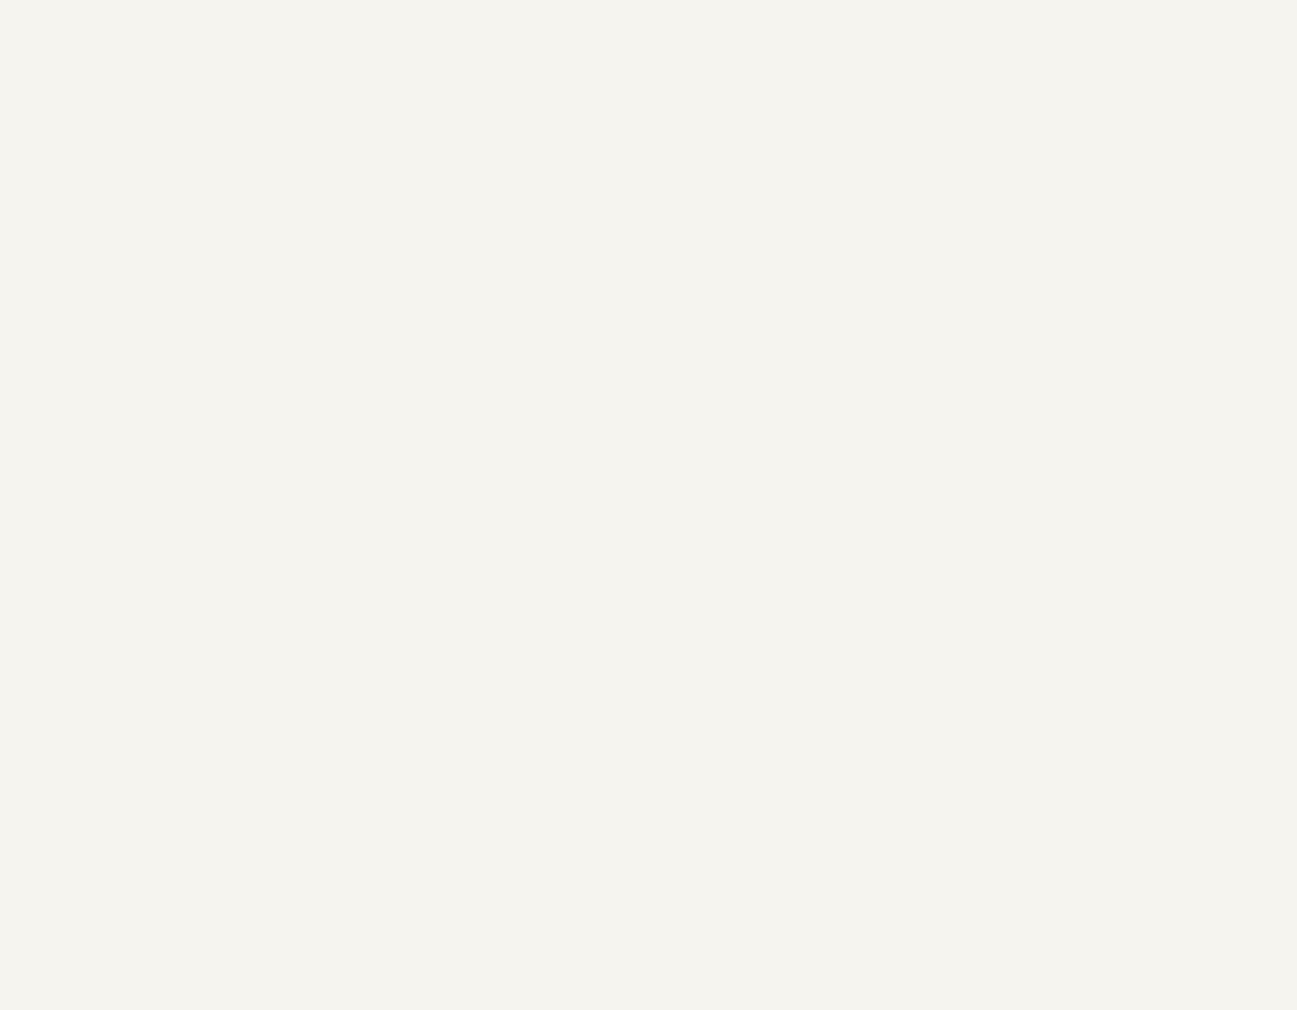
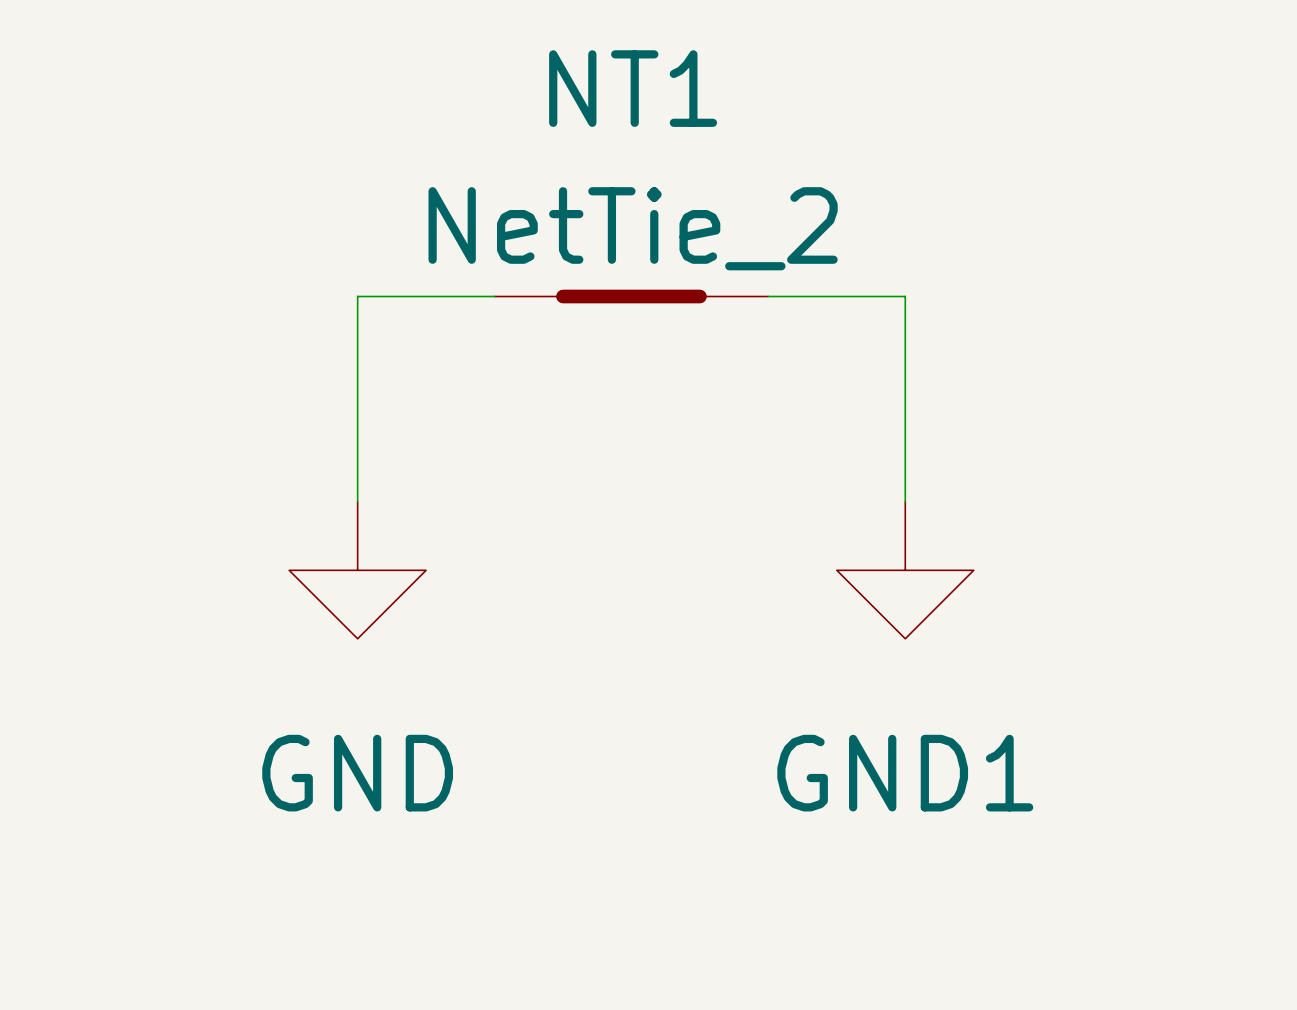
wire: none -> (494, 296) (357, 296) (357, 501)
NT1: none -> NetTie_2 (631, 296)
wire: none -> (768, 296) (905, 296) (905, 501)
power symbol: none -> GND (357, 570)
power symbol: none -> GND1 (905, 570)

